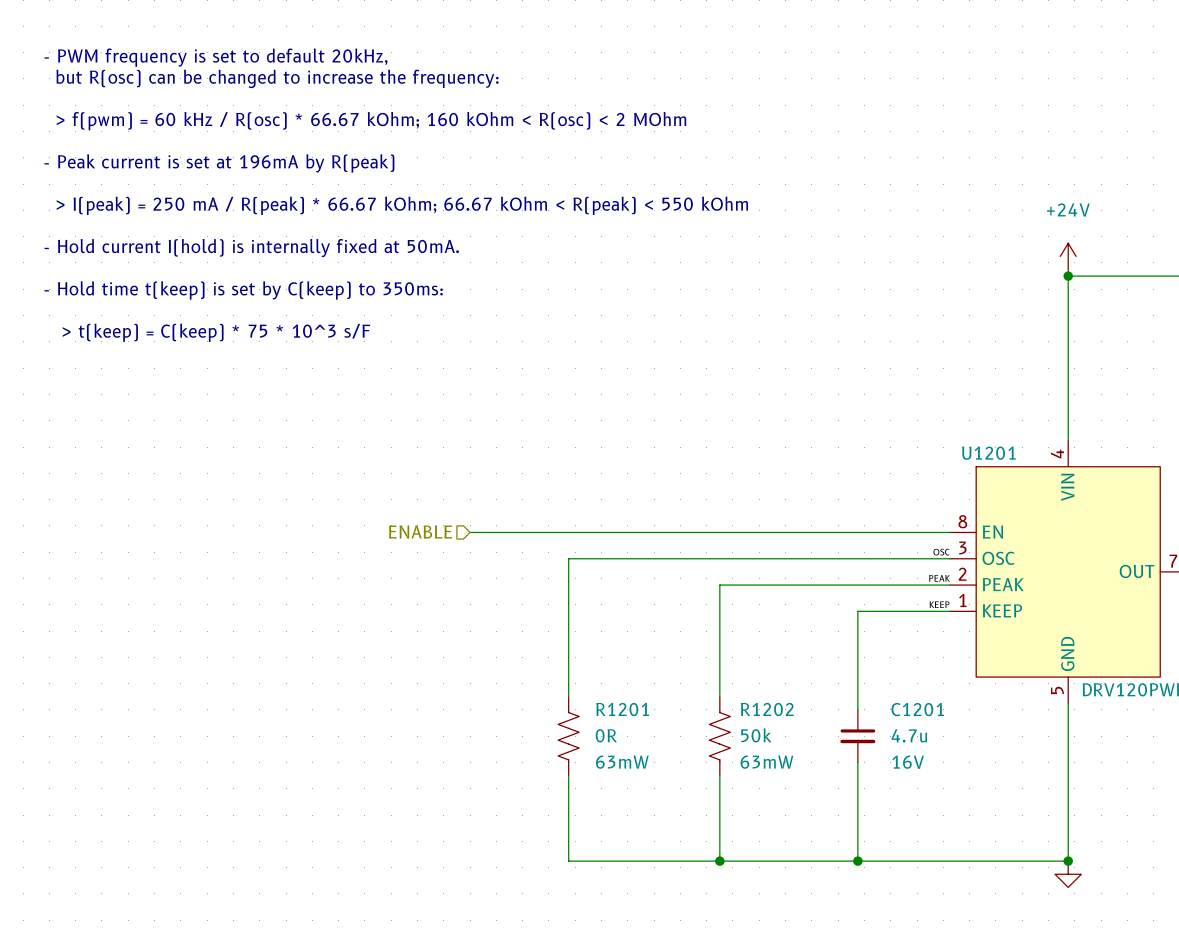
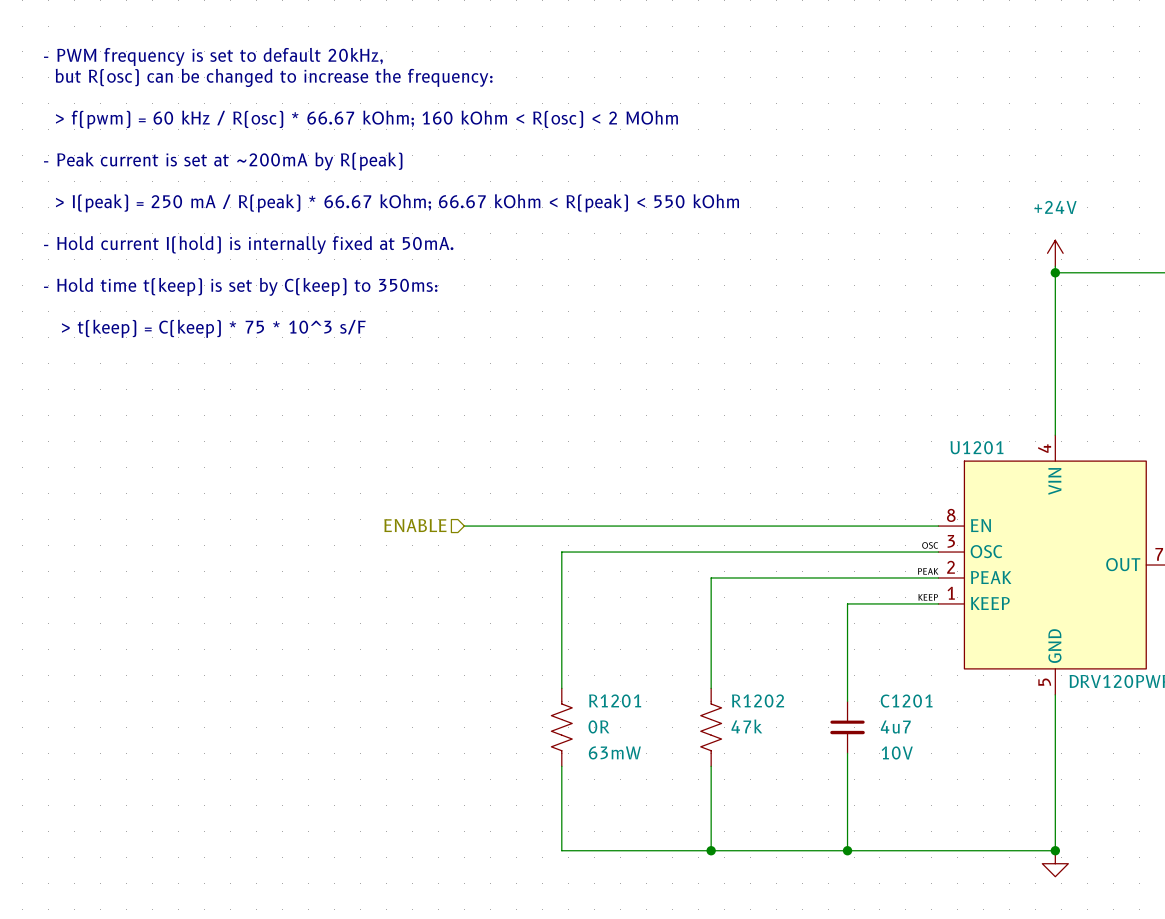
text: - Peak current is set at 196mA by R(peak) (219, 163) -> - Peak current is set at ~200mA by R(peak) (223, 161)
R1202 value: 50k (756, 735) -> 47k (746, 726)
C1201 value: 4.7u (909, 735) -> 4u7 (895, 727)
R1202 text: 63mW (766, 762) -> none
C1201 text: 16V (908, 762) -> 10V (897, 752)

